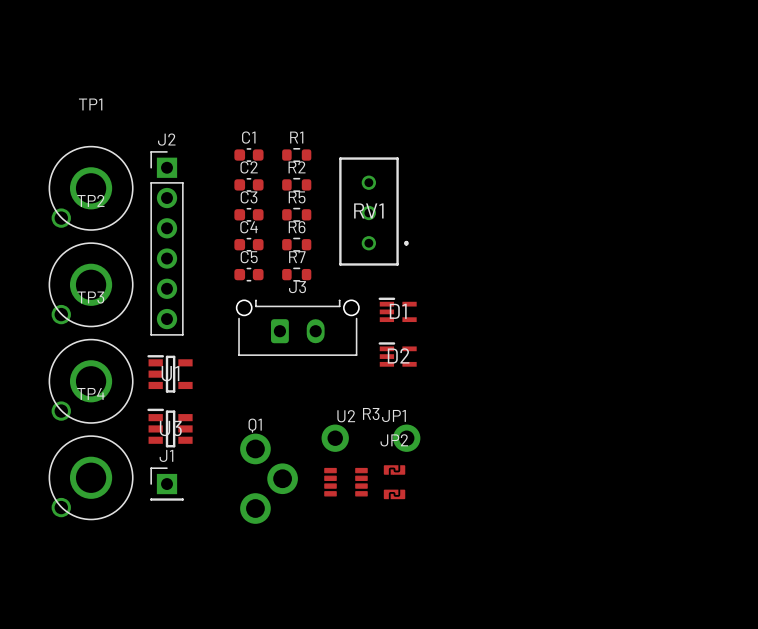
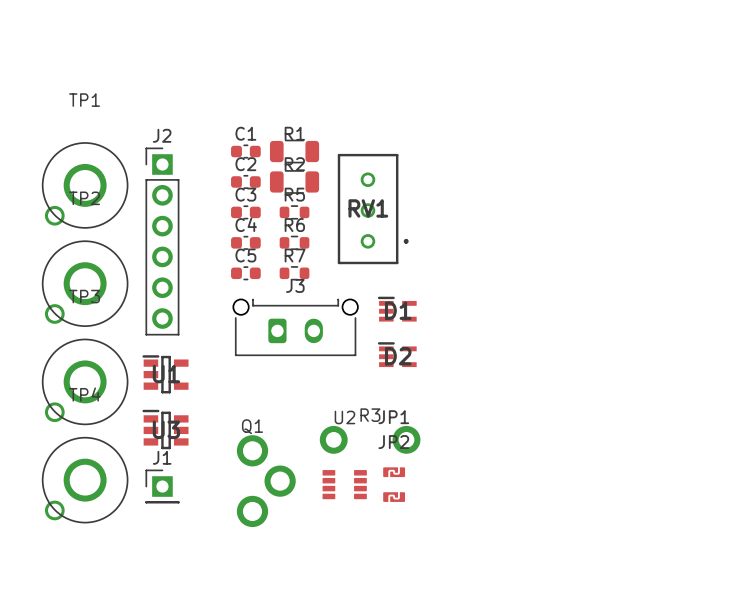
R1 footprint: [282, 148, 312, 162] -> [269, 139, 320, 164]
R2 footprint: [282, 177, 312, 192] -> [269, 170, 320, 194]

